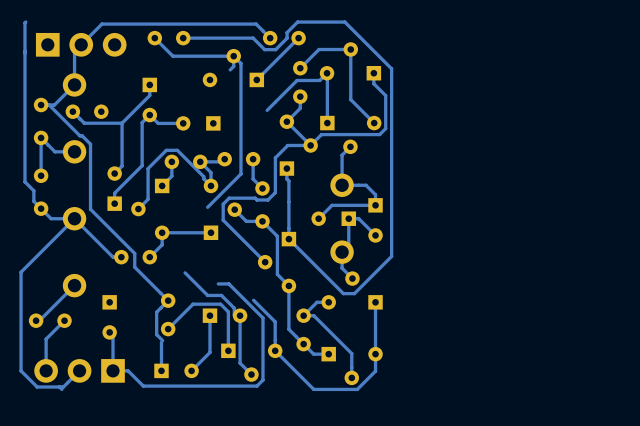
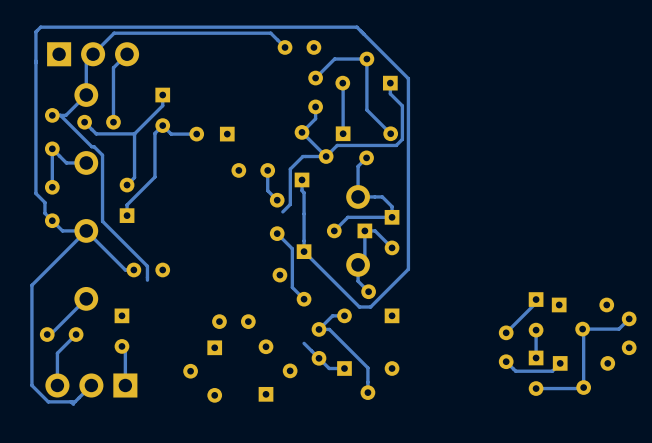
track: (344, 22) (297, 22) (287, 32) (287, 38) (275, 49) (264, 49) (253, 38) (183, 38) -> (360, 31) (356, 27) (40, 27) (36, 31)
track: (154, 38) (172, 56) (233, 56) -> none
part: (169, 38) -> none
track: (298, 38) (256, 79) -> none
track: none -> (127, 54) (113, 67) (113, 122)
track: (233, 56) (240, 63) (240, 174) (207, 207) -> none
track: (233, 56) (233, 66) (230, 69) -> none
part: (233, 68) -> none
track: (327, 73) (319, 80) (297, 80) (267, 110) -> none
track: (171, 161) (171, 176) (162, 185) -> none
part: (186, 161) -> none
track: (222, 161) (200, 161) (210, 172) (210, 185) (177, 150) (166, 150) (148, 168) (148, 199) (138, 209) -> none
track: (268, 199) (229, 198) (223, 204) (223, 220) (265, 262) -> none
part: (150, 209) -> none
part: (222, 209) -> none
track: (234, 209) (246, 221) (262, 221) -> none
track: (210, 232) (162, 232) (162, 244) (149, 257) -> none
track: (134, 267) (168, 300) (156, 312) (156, 334) (162, 340) -> none
track: (185, 272) (207, 295) (221, 295) (234, 308) (234, 314) (240, 315) (240, 363) (251, 374) -> none
track: (218, 283) (228, 283) (262, 318) (262, 380) (256, 386) (143, 386) (128, 370) (113, 370) -> none
track: (288, 285) (288, 329) -> none
track: none -> (536, 299) (536, 302) (506, 332)
track: (253, 300) (275, 321) (275, 350) (313, 389) (357, 389) (375, 371) (375, 302) -> none
part: none -> (536, 314)
part: none -> (582, 317)
track: none -> (629, 318) (618, 329) (582, 329) (582, 388) (536, 388)
part footprint: [202, 308, 248, 323] -> [212, 314, 256, 329]
part: (168, 314) -> none
track: (209, 315) (209, 352) (191, 370) -> none
track: none -> (536, 330) (536, 357)
part: none -> (629, 333)
track: (168, 329) (193, 304) (220, 304) (228, 311) (228, 350) -> none
part: none -> (506, 347)
track: (161, 342) (161, 370) -> none
track: none -> (506, 361) (515, 371) (552, 371) (560, 363)
part: none -> (202, 371)
part: none -> (536, 373)
part: none -> (583, 375)
part rotation: 0° (251, 362) -> 90° counterclockwise (278, 370)
part: (176, 370) -> none

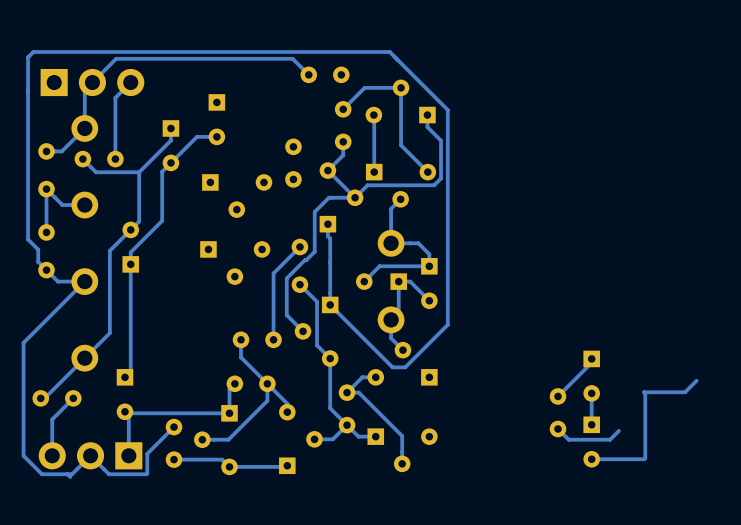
track: (60, 115) (102, 155) (102, 221) (147, 266) (147, 280) -> none
track: (162, 125) (171, 134) (196, 134) -> (170, 162) (196, 136) (216, 136)
part rotation: 0° (211, 134) -> 90° counterclockwise (216, 119)
part position: (211, 134) -> (216, 119)
part: none -> (237, 196)
part rotation: 0° (253, 170) -> 90° clockwise (293, 163)
part position: (253, 170) -> (293, 163)
track: (267, 170) (267, 190) (277, 200) -> (273, 339) (273, 273) (299, 246)
track: none -> (130, 229) (109, 250) (109, 333) (84, 358)
track: none -> (306, 260) (286, 278) (286, 315) (303, 331)
part: none -> (235, 263)
track: none -> (130, 264) (130, 371) (124, 377)
track: (86, 230) (125, 269) (133, 269) -> none
part: (148, 269) -> none
track: none -> (241, 339) (241, 357) (287, 403) (287, 412)
part: none -> (257, 339)
track: none -> (330, 358) (330, 408)
part: (582, 317) -> none
track: none -> (234, 383) (229, 389) (229, 413) (126, 413)
track: none -> (267, 383) (267, 400) (228, 439) (202, 439)
part: (629, 333) -> none
track: none -> (347, 425) (332, 439) (314, 439)
track: none -> (174, 427) (147, 453) (146, 474) (109, 474) (90, 455)
part: none -> (174, 443)
part: (583, 375) -> none
track: none -> (174, 459) (222, 459) (229, 466) (287, 465)

